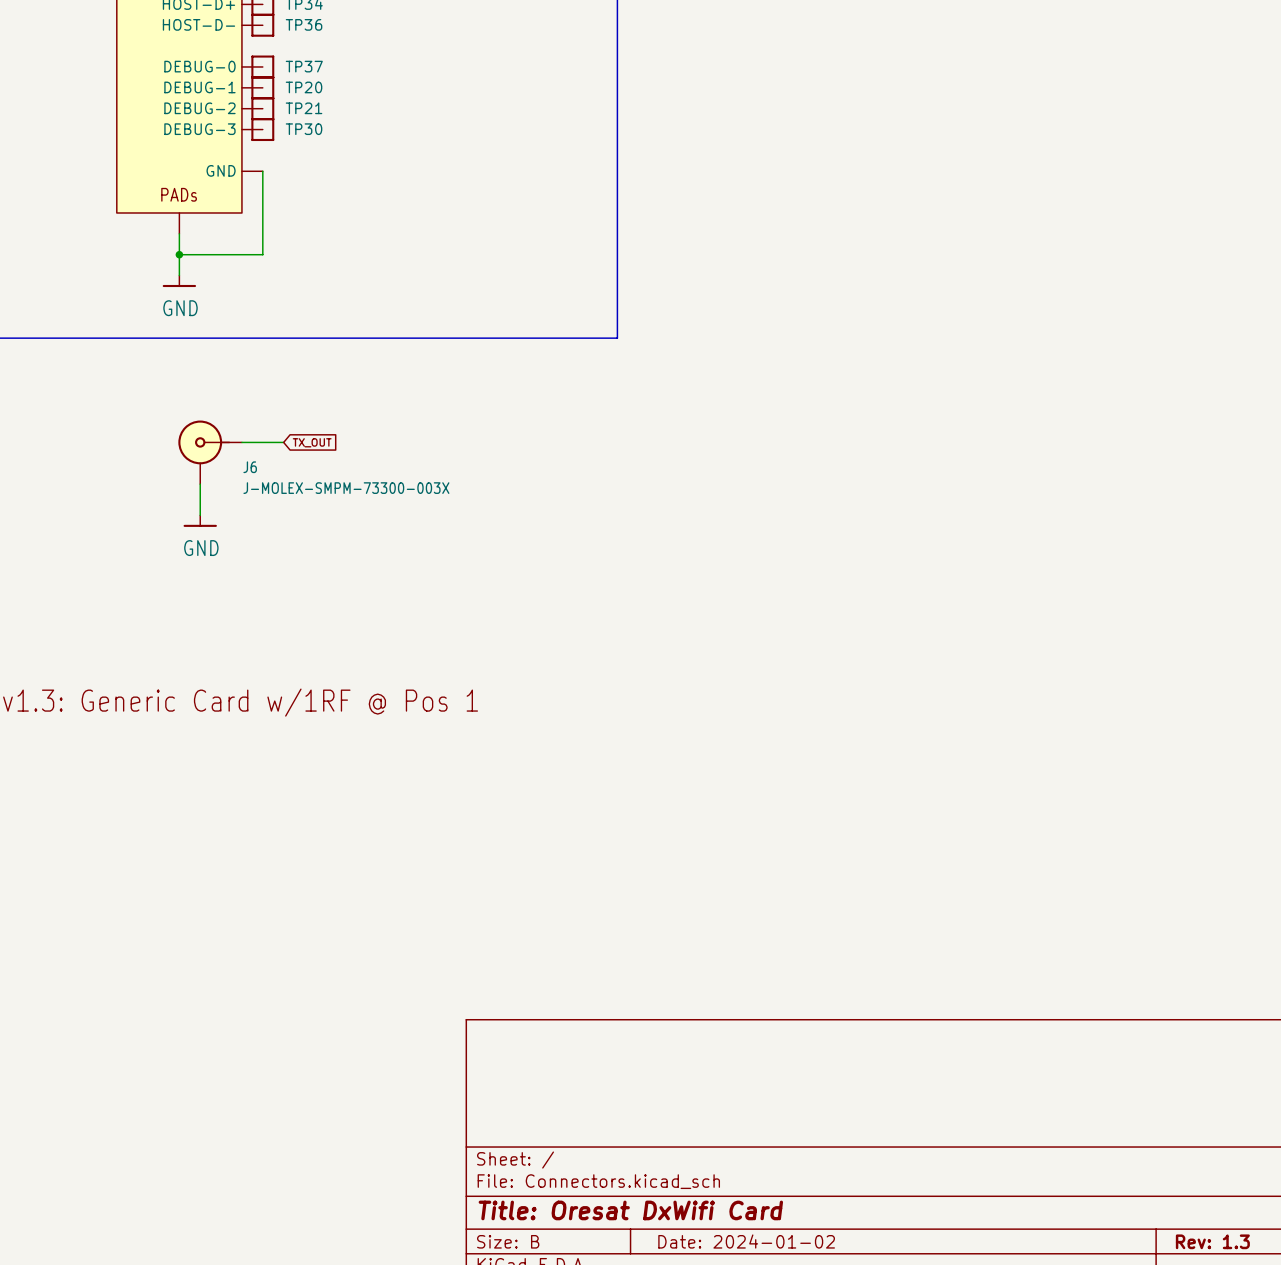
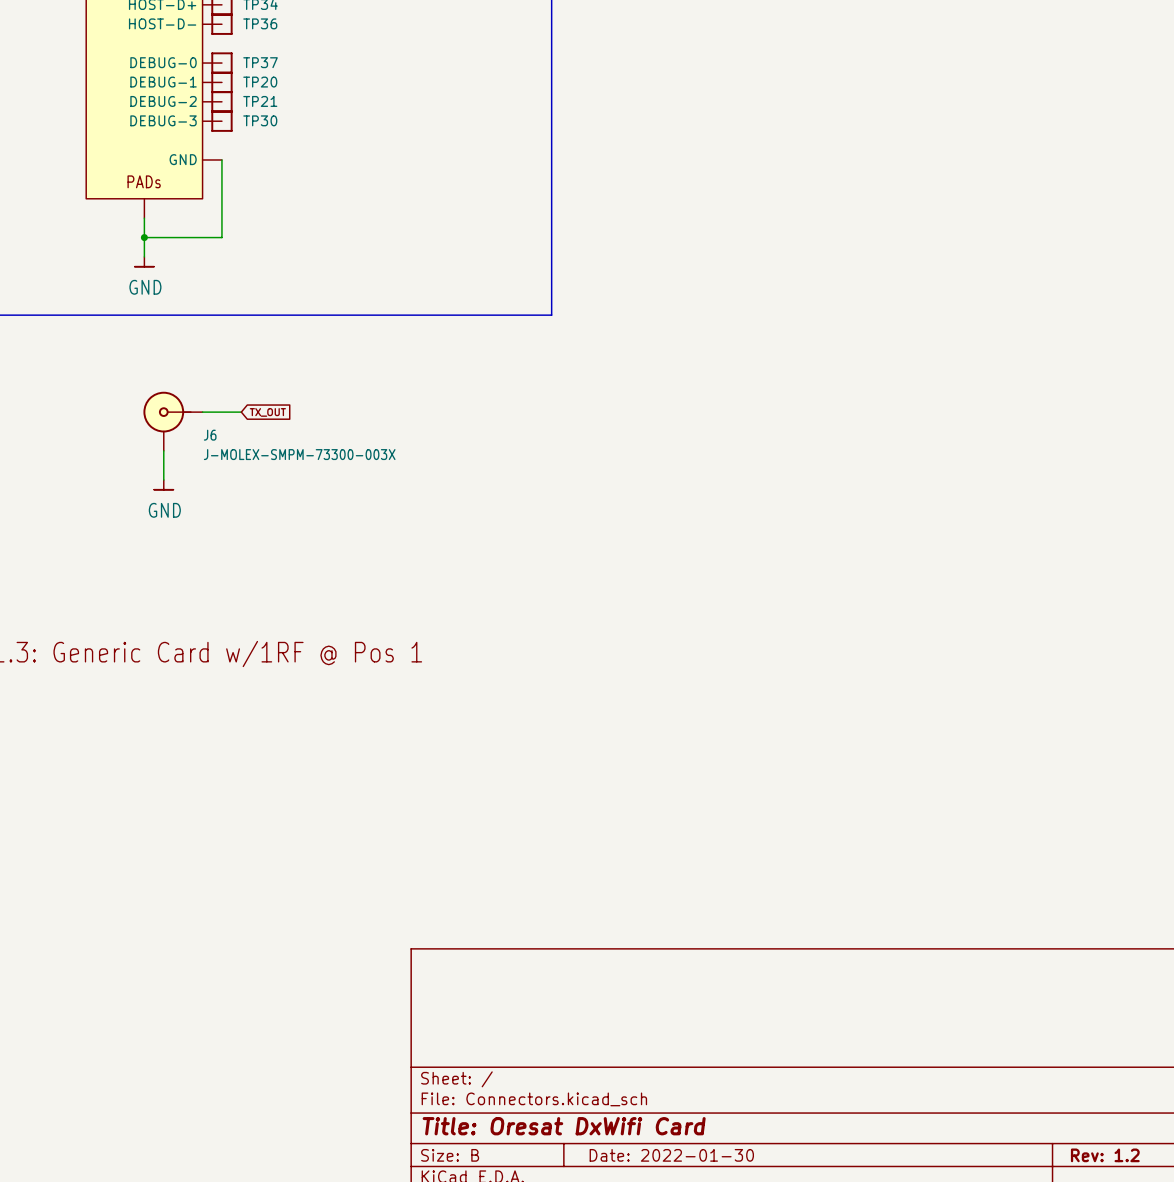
power symbol shape: [162, 275, 197, 288] -> [134, 256, 155, 267]
power symbol shape: [183, 515, 217, 527] -> [154, 479, 174, 490]
title block: Date: 2024-01-02 (746, 1241) -> Date: 2022-01-30 (671, 1155)
title block: Rev: 1.3 (1212, 1241) -> Rev: 1.2 (1105, 1155)

